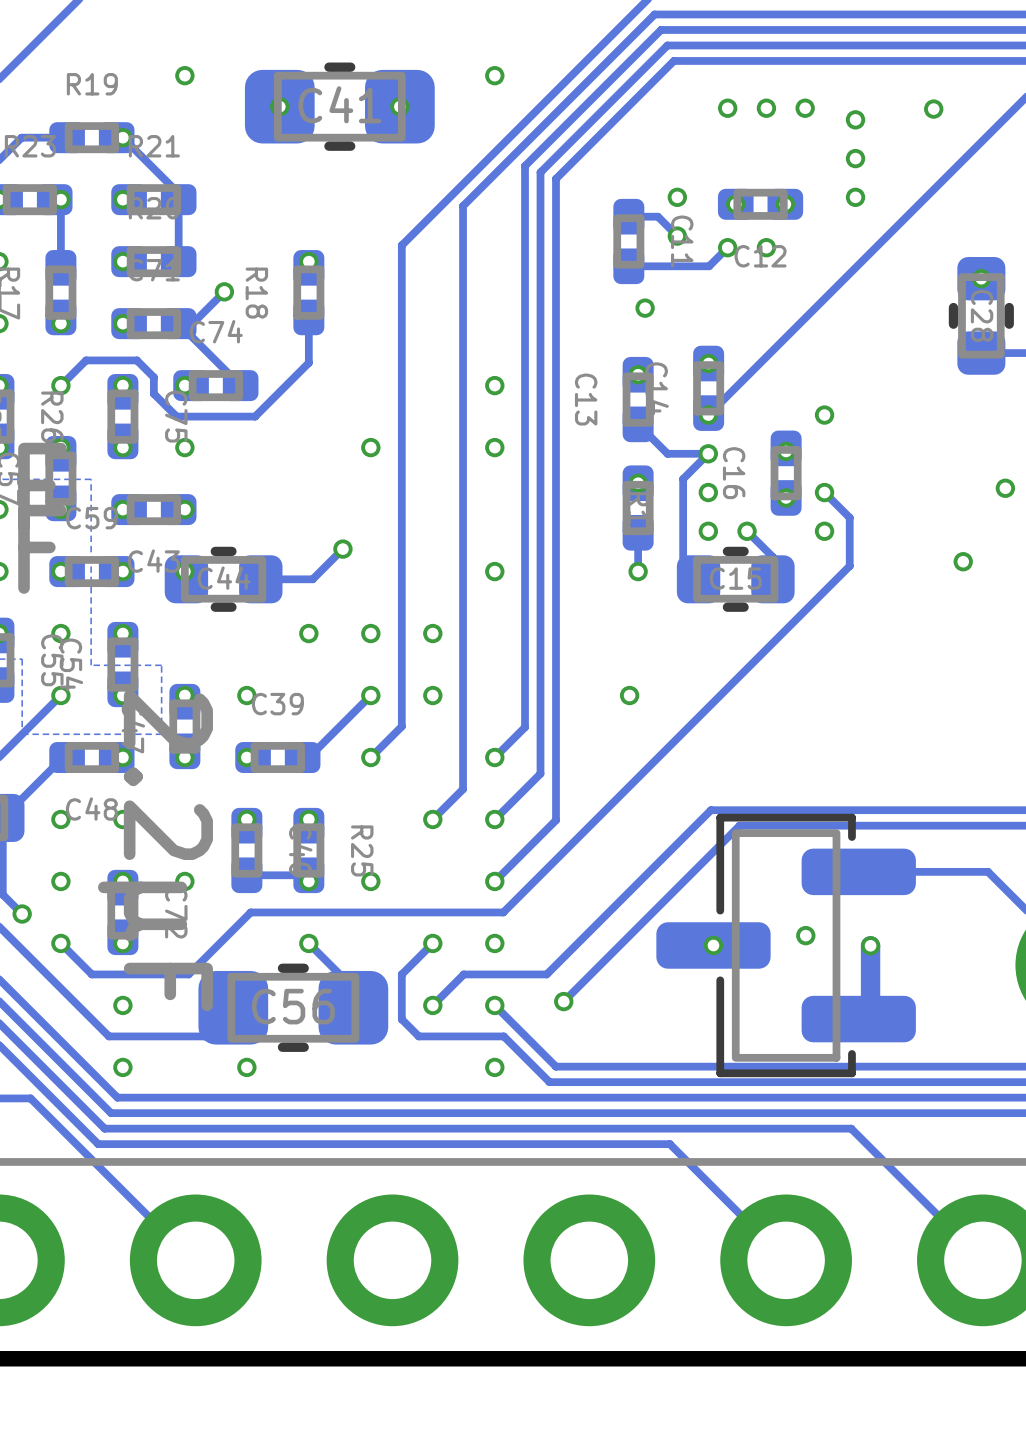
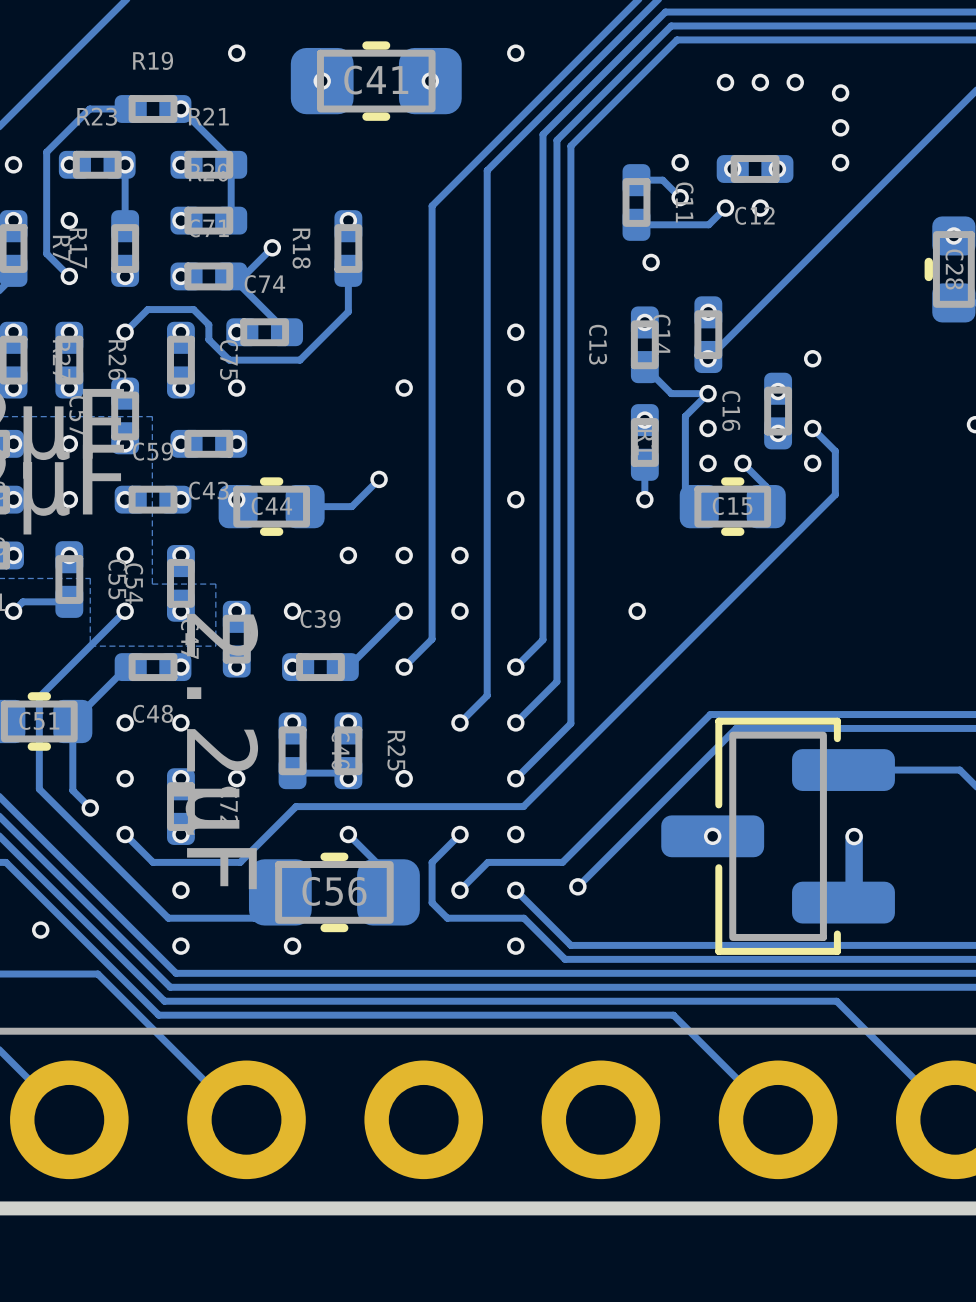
via: (933, 109) -> none
via: (963, 561) -> none
via: (805, 935) -> none

